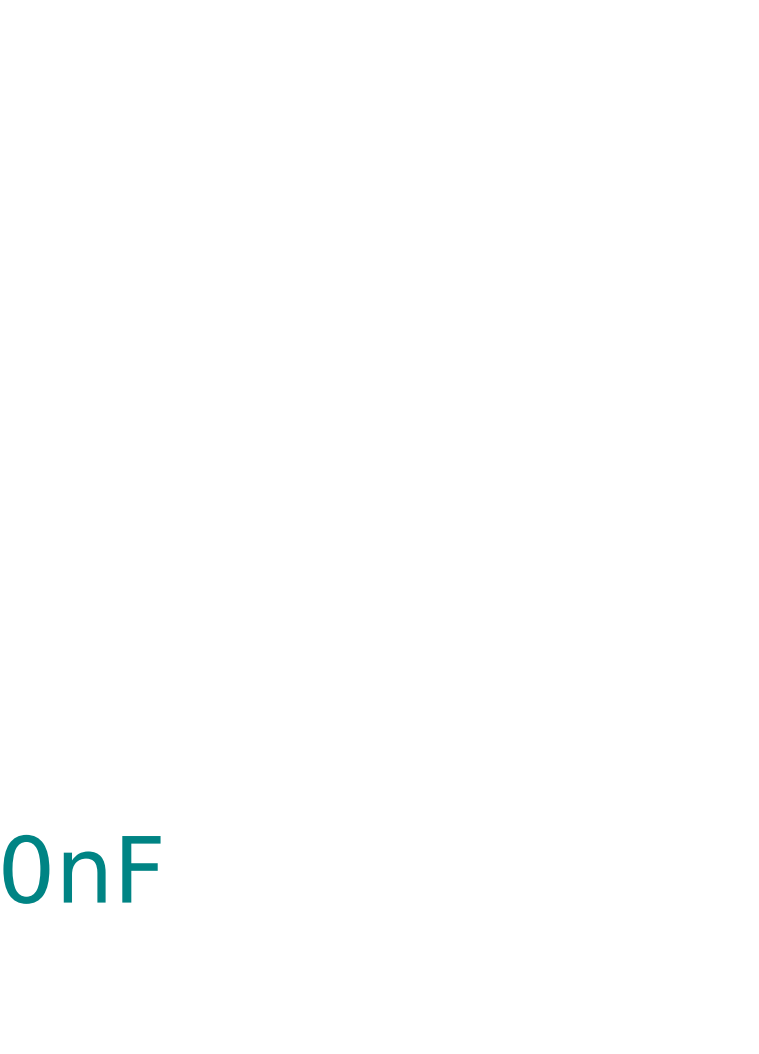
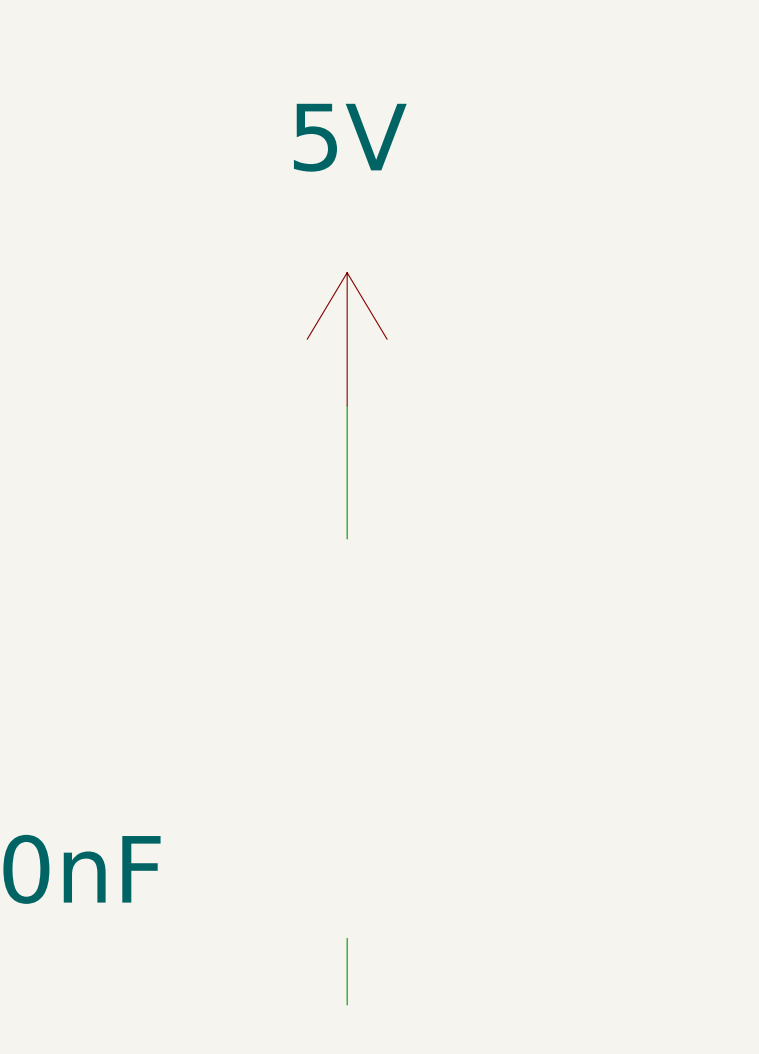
power symbol: none -> 5V (347, 339)
wire: none -> (347, 405) (347, 538)
wire: none -> (347, 938) (347, 1004)

